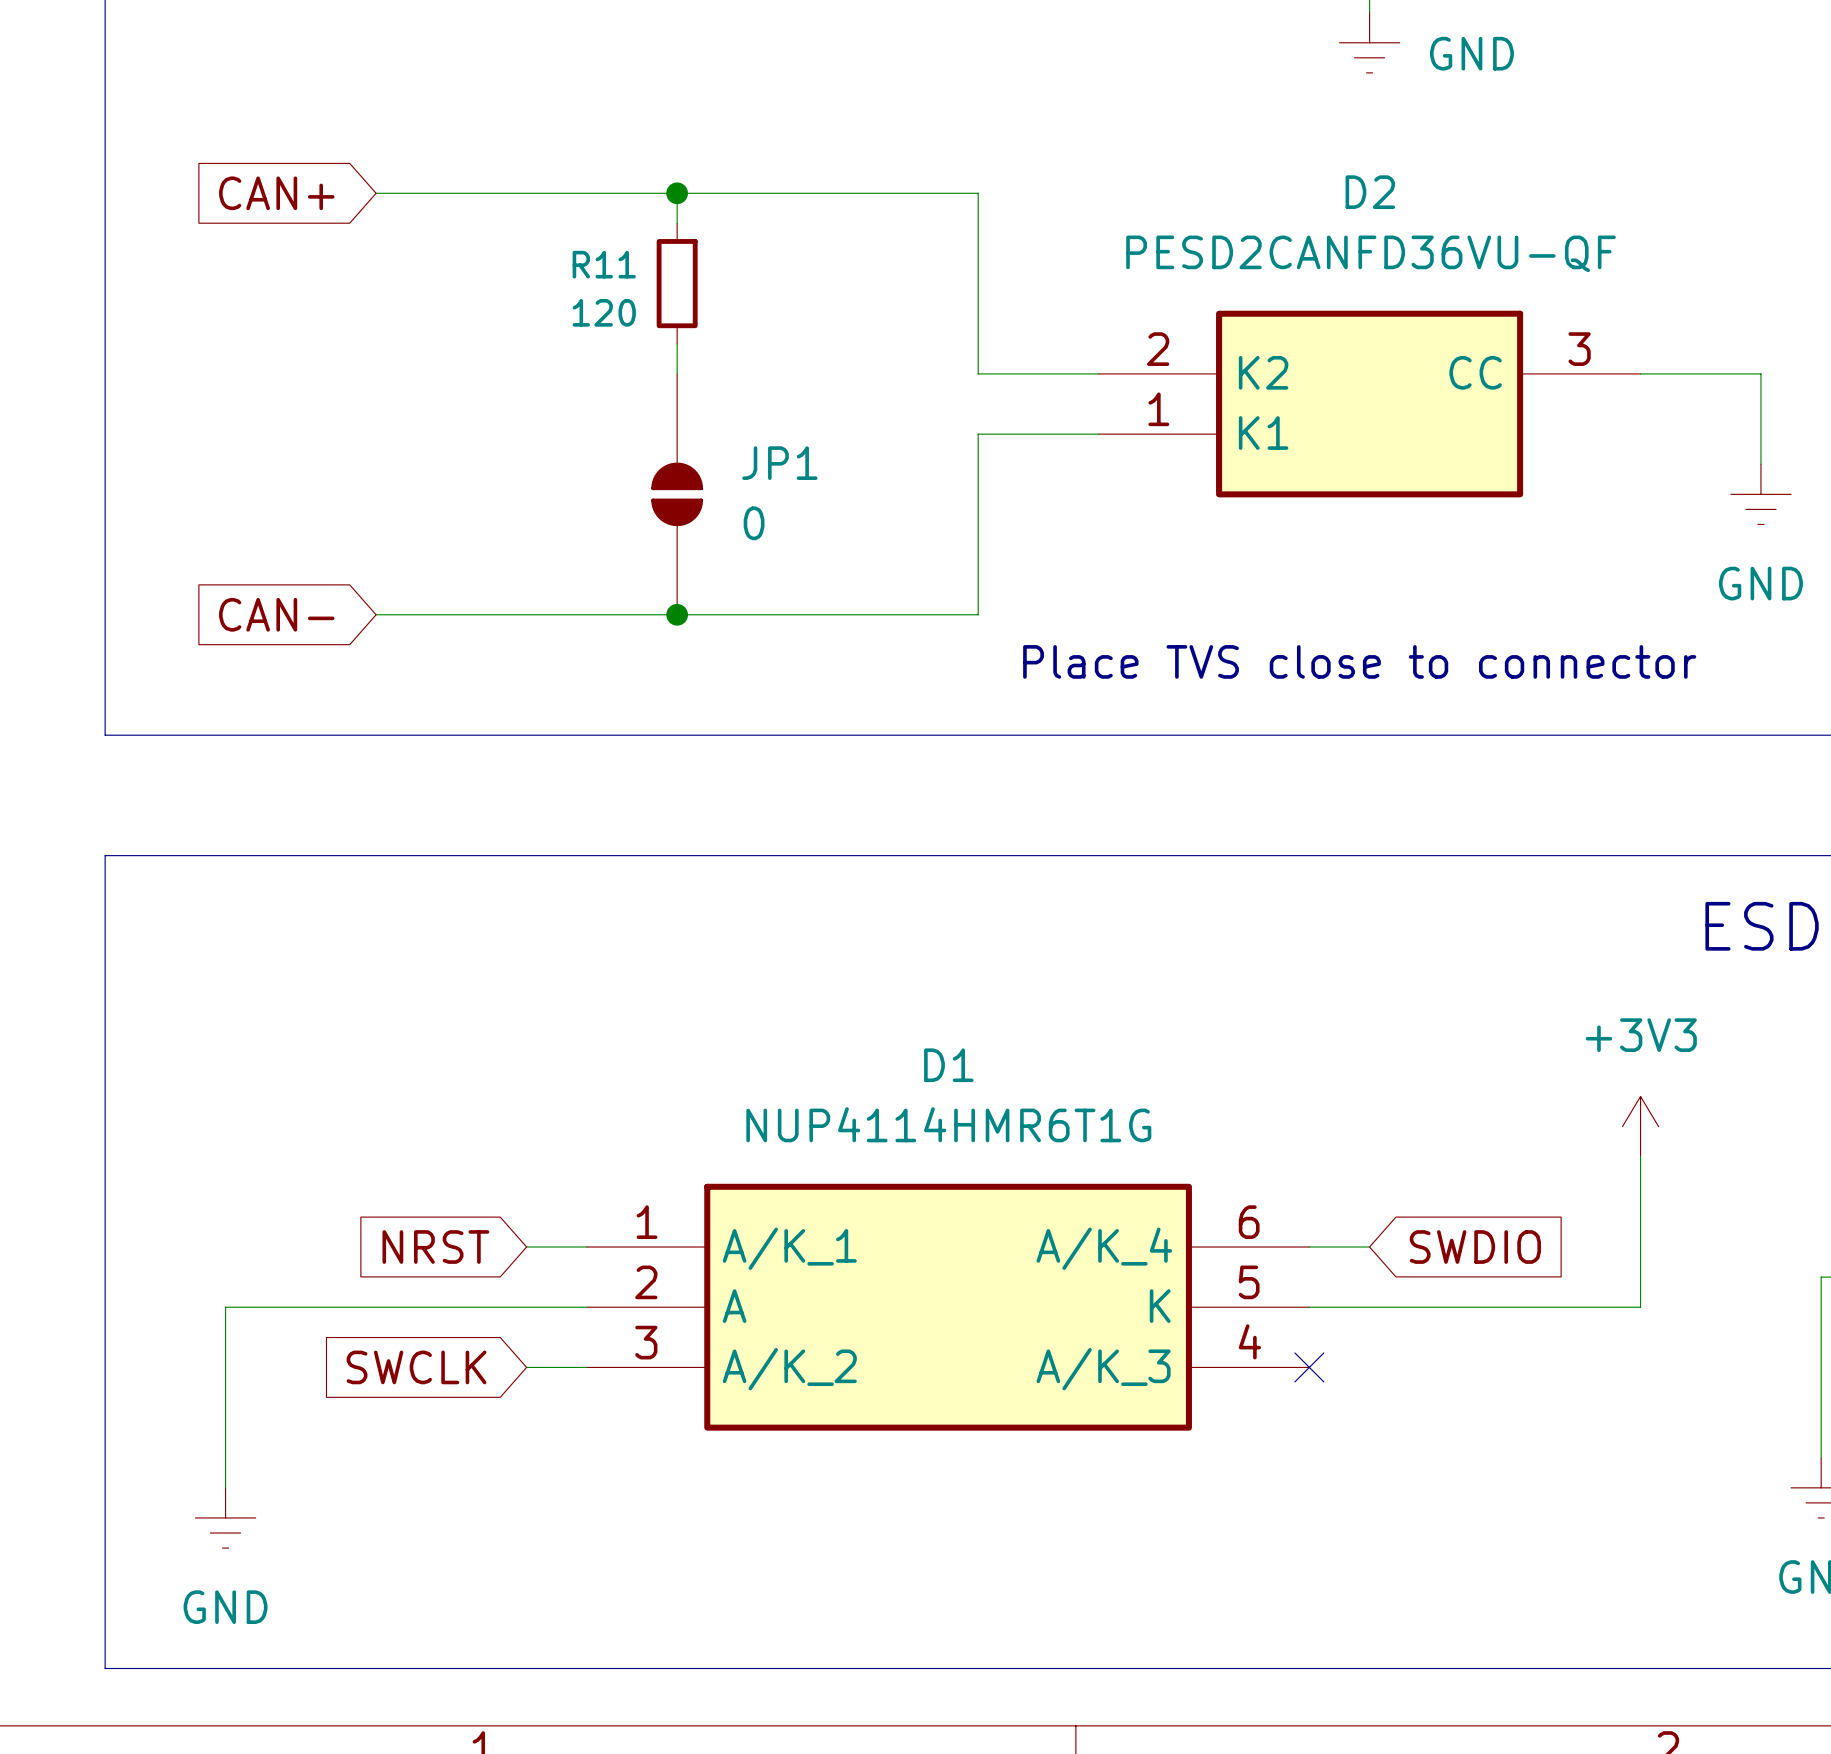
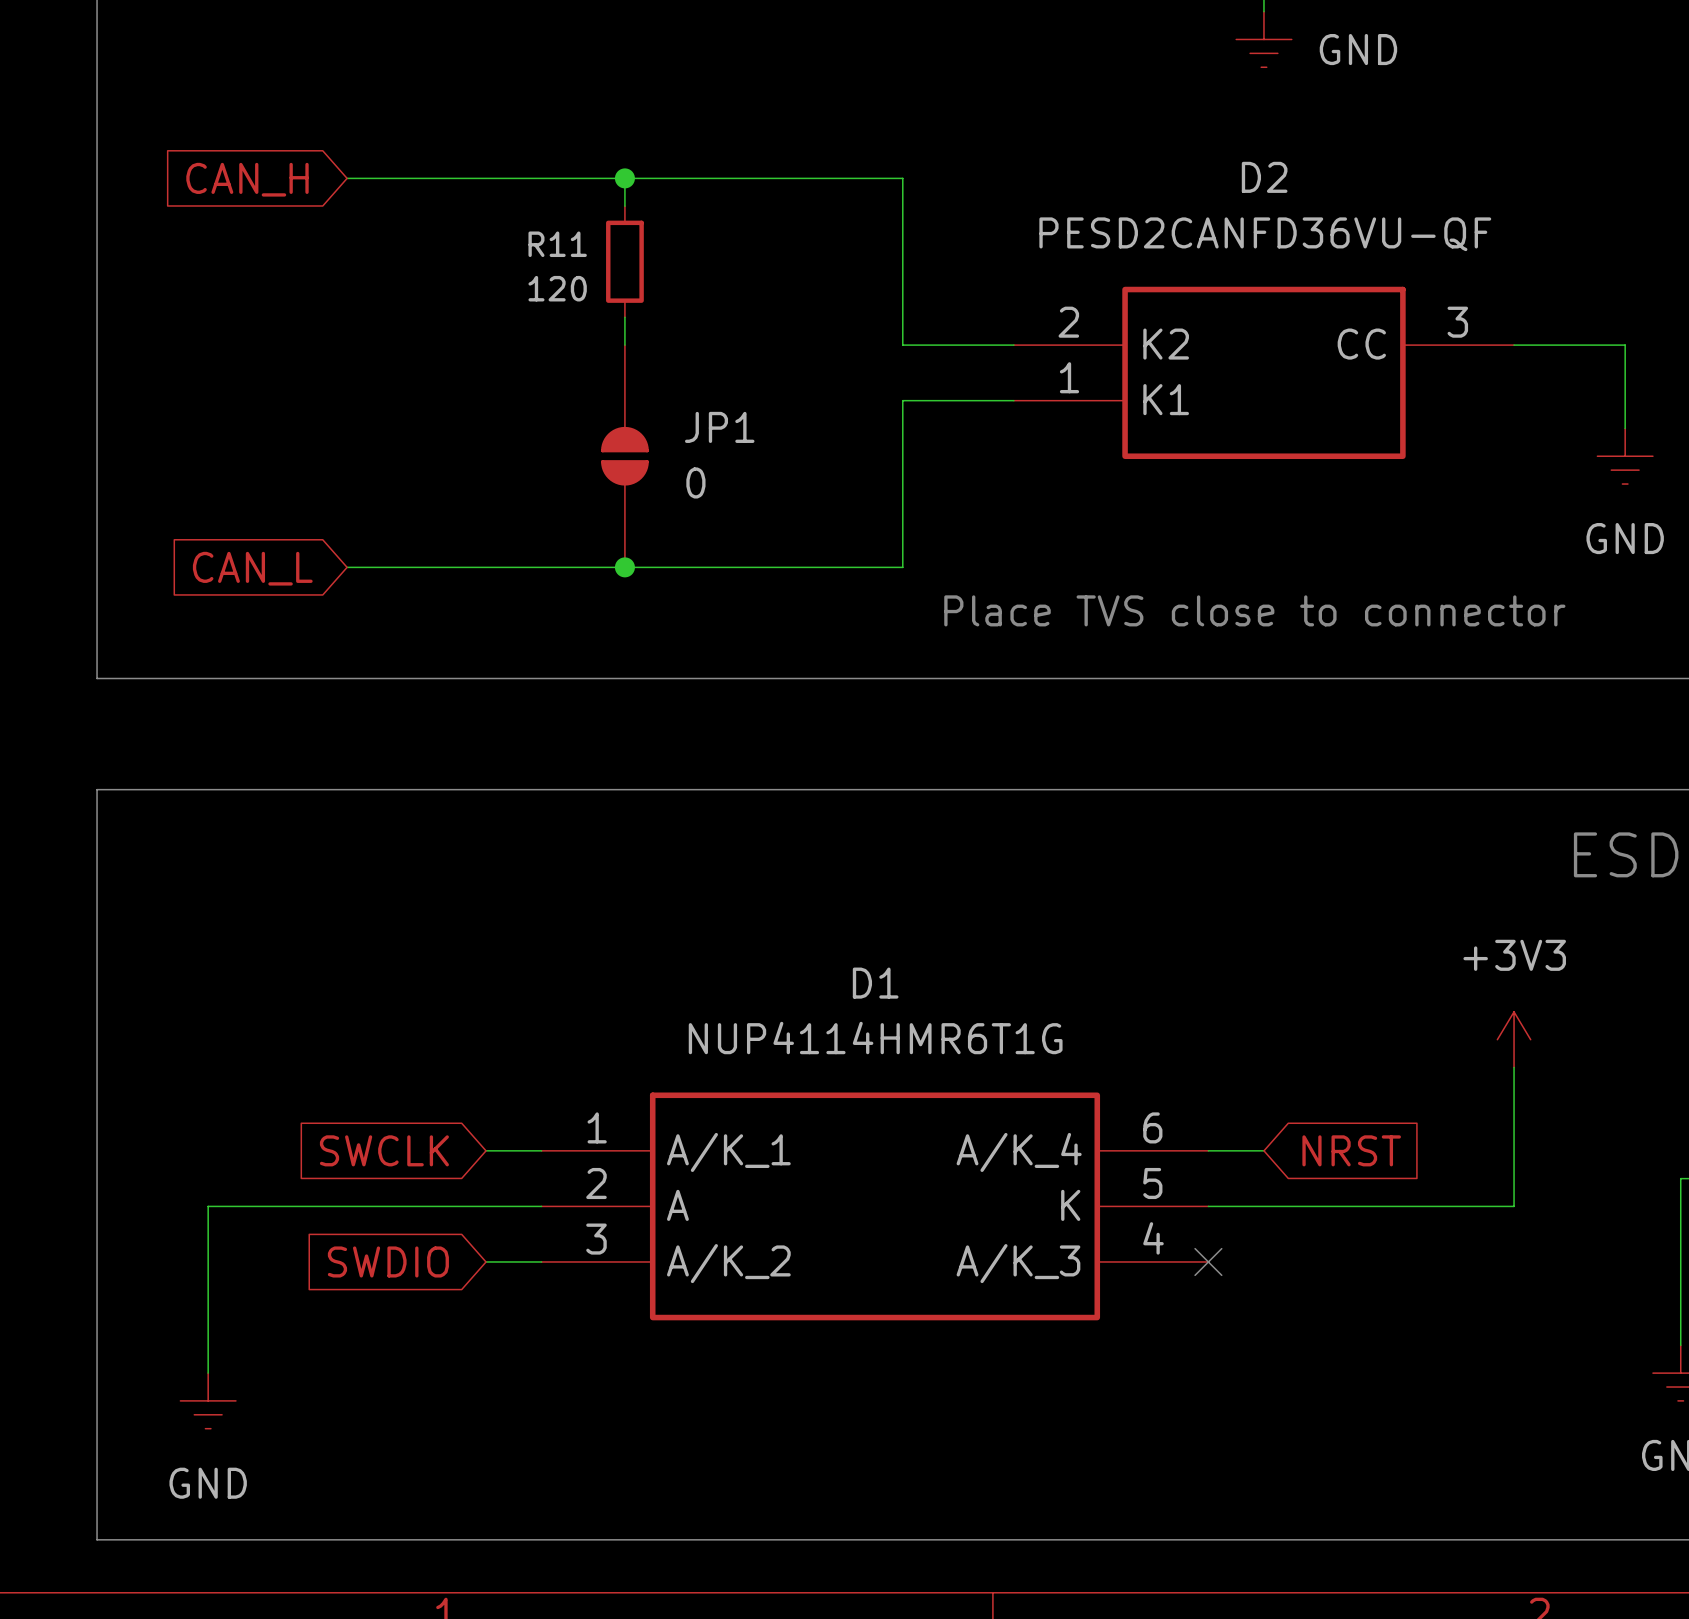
global label: CAN+ (276, 193) -> CAN_H (247, 179)
global label: CAN- (276, 614) -> CAN_L (252, 568)
global label: NRST (435, 1247) -> SWCLK (384, 1150)
global label: SWDIO (1475, 1247) -> NRST (1351, 1150)
global label: SWCLK (416, 1367) -> SWDIO (388, 1261)

